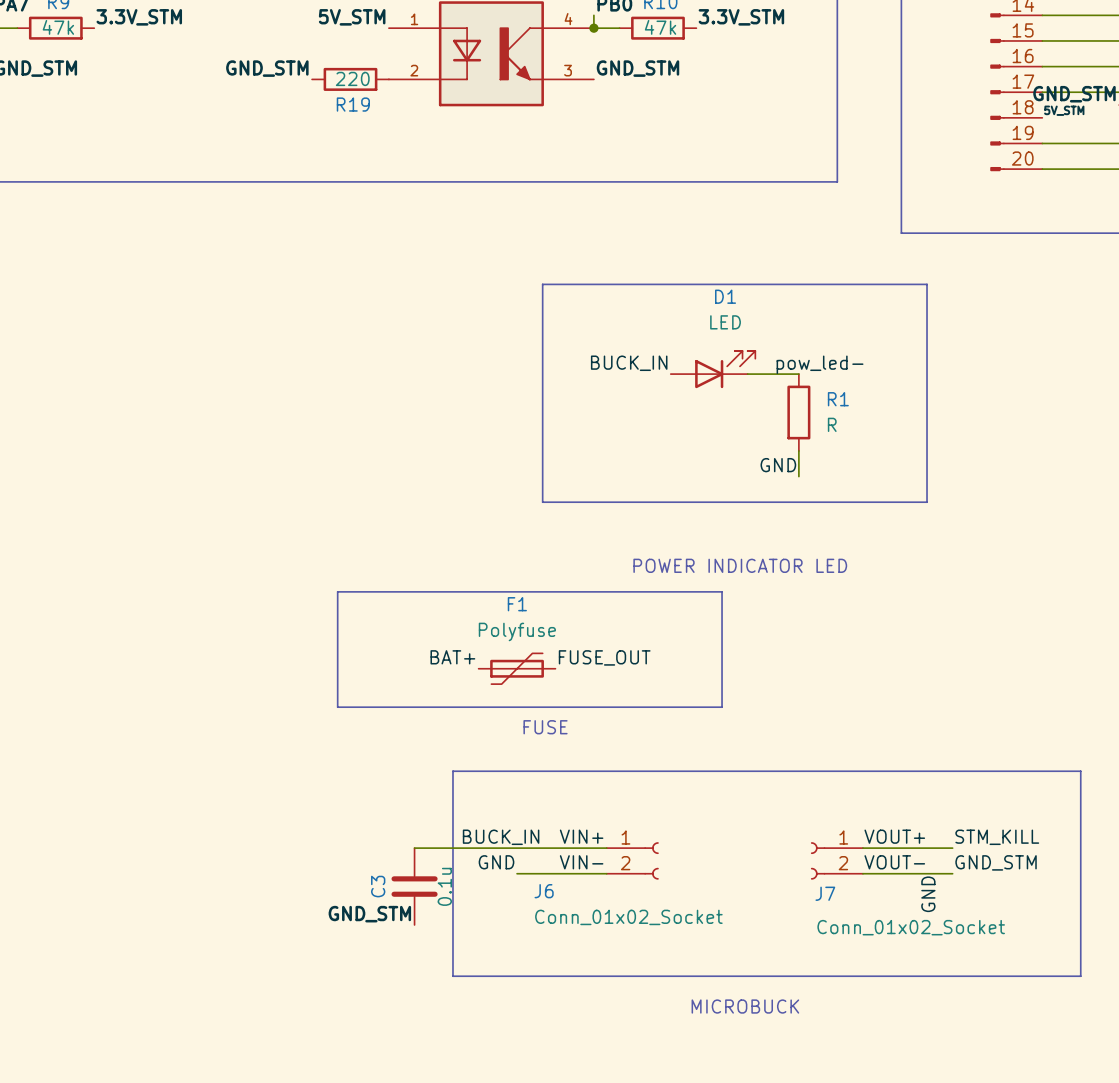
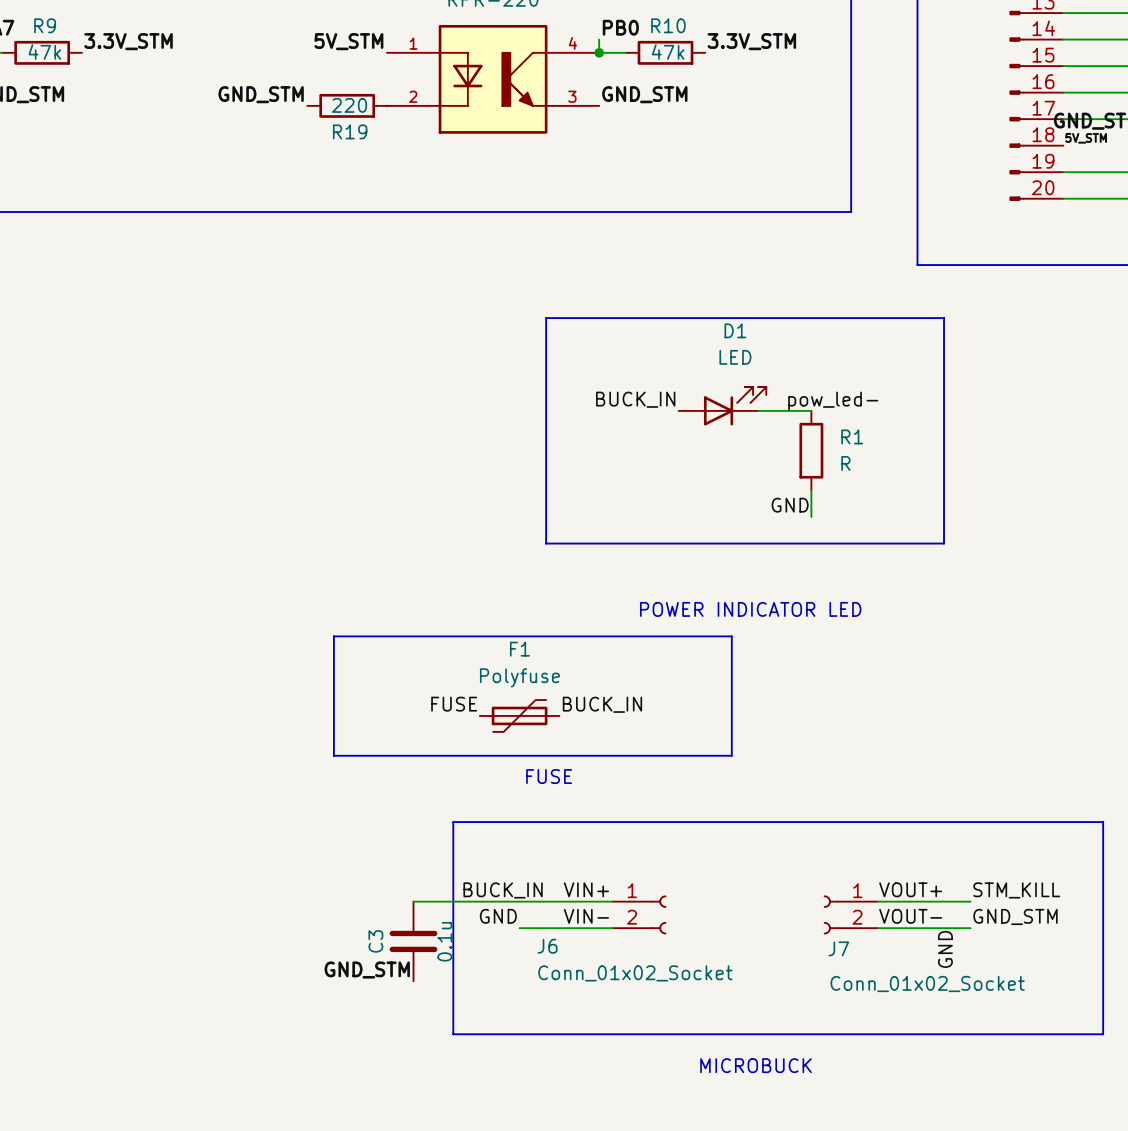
label: BAT+ (452, 657) -> FUSE (454, 704)
label: FUSE_OUT (604, 657) -> BUCK_IN (602, 704)

